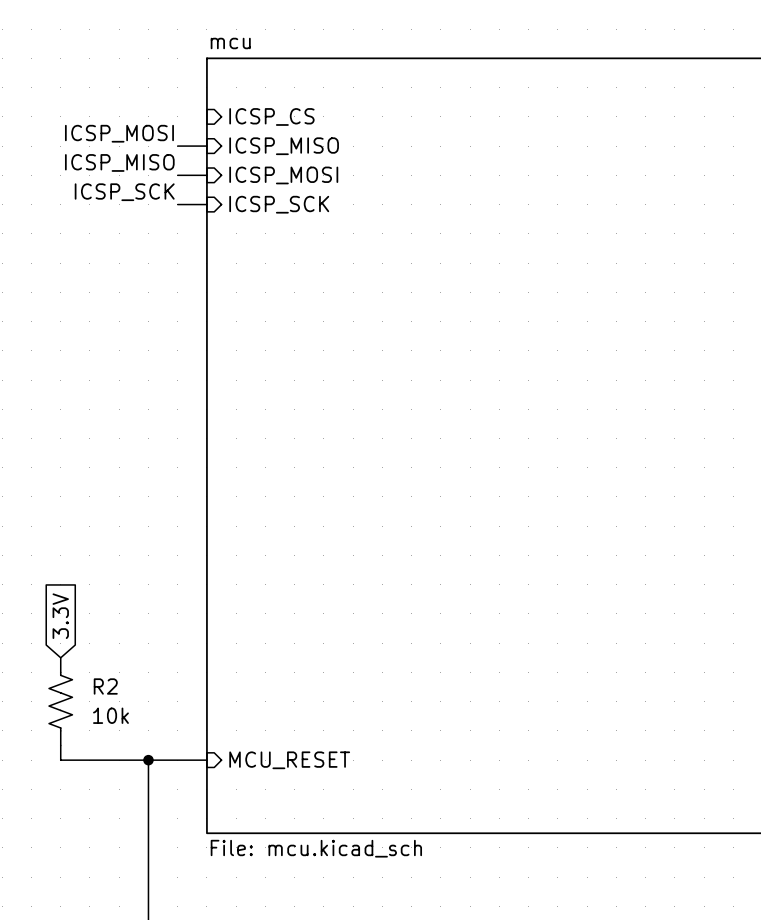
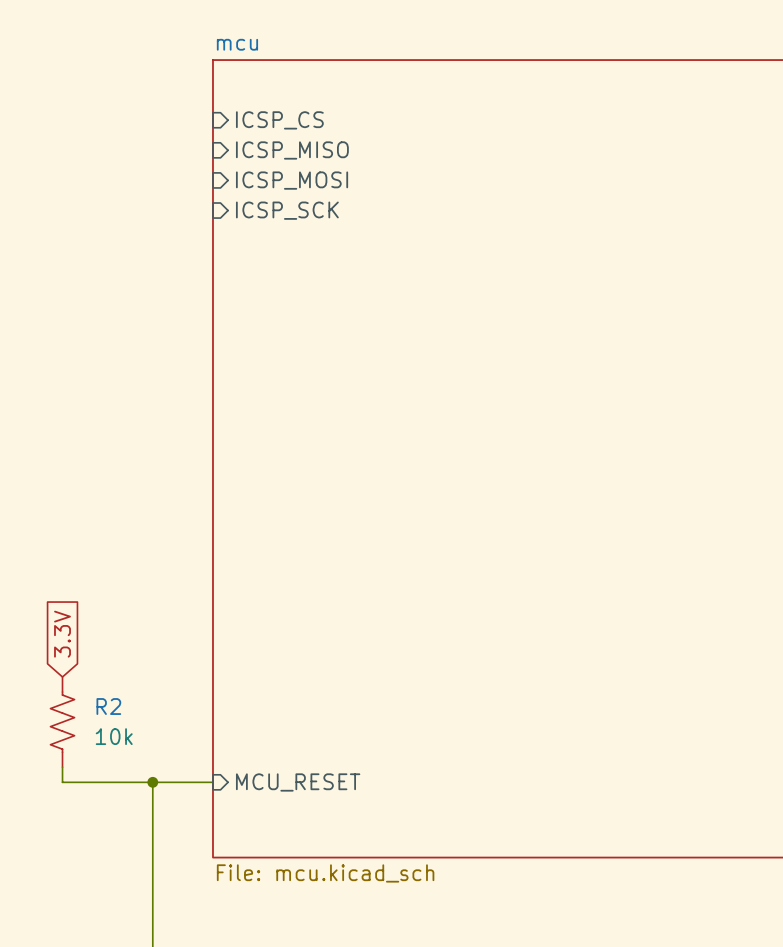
label: ICSP_MOSI (119, 133) -> none
wire: (177, 146) (206, 146) -> none
label: ICSP_MISO (119, 162) -> none
wire: (177, 175) (206, 175) -> none
label: ICSP_SCK (124, 192) -> none
wire: (177, 204) (206, 204) -> none

